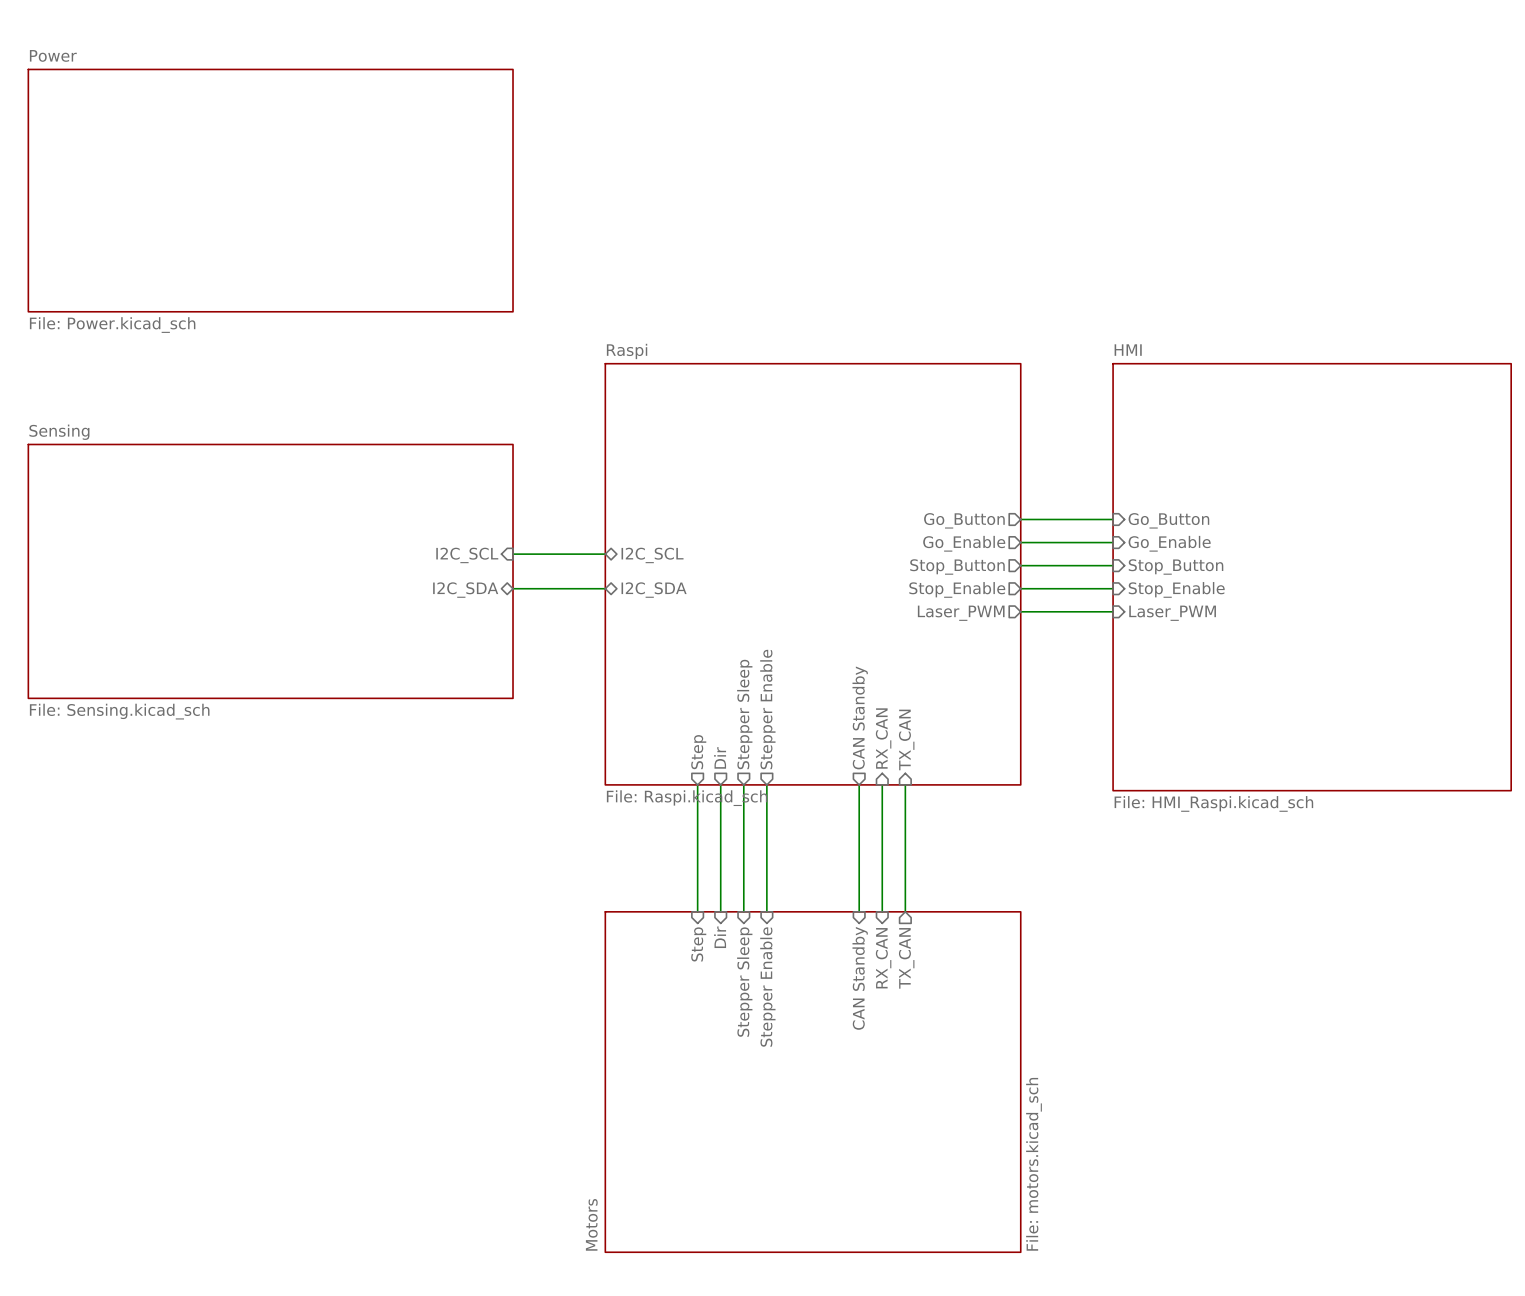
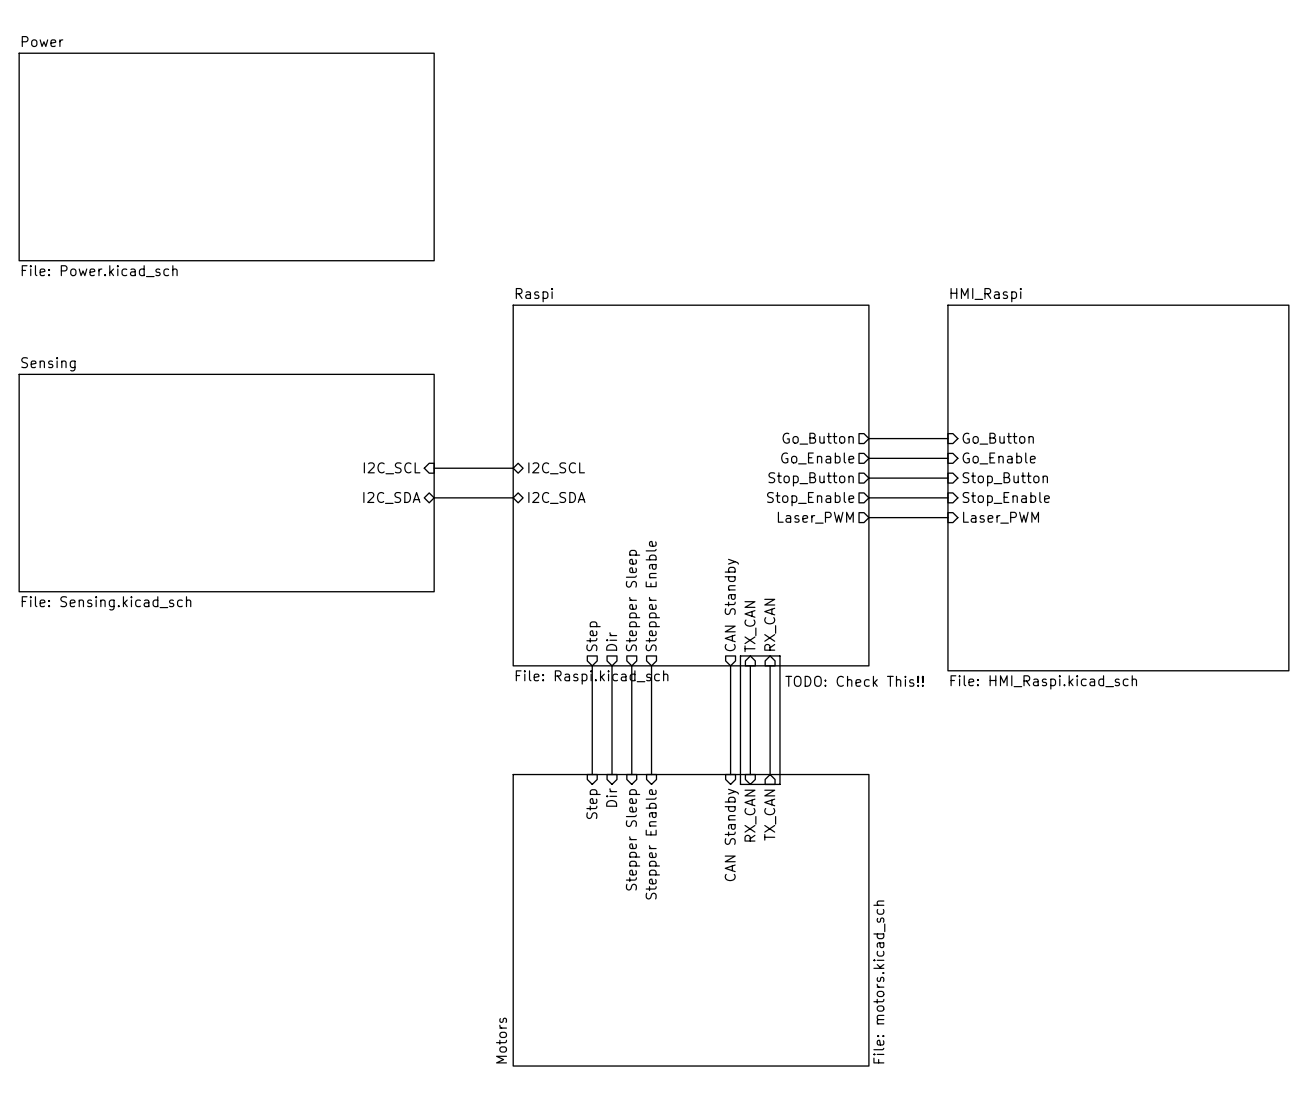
sheet HMI name: HMI (1128, 350) -> HMI_Raspi (986, 295)
sheet pin: RX_CAN (883, 738) -> TX_CAN (750, 626)
sheet pin: TX_CAN (906, 739) -> RX_CAN (770, 624)
line: none -> (740, 655) (779, 655) (779, 784) (740, 784) (740, 655)
text: none -> TODO: Check This!! (854, 681)

